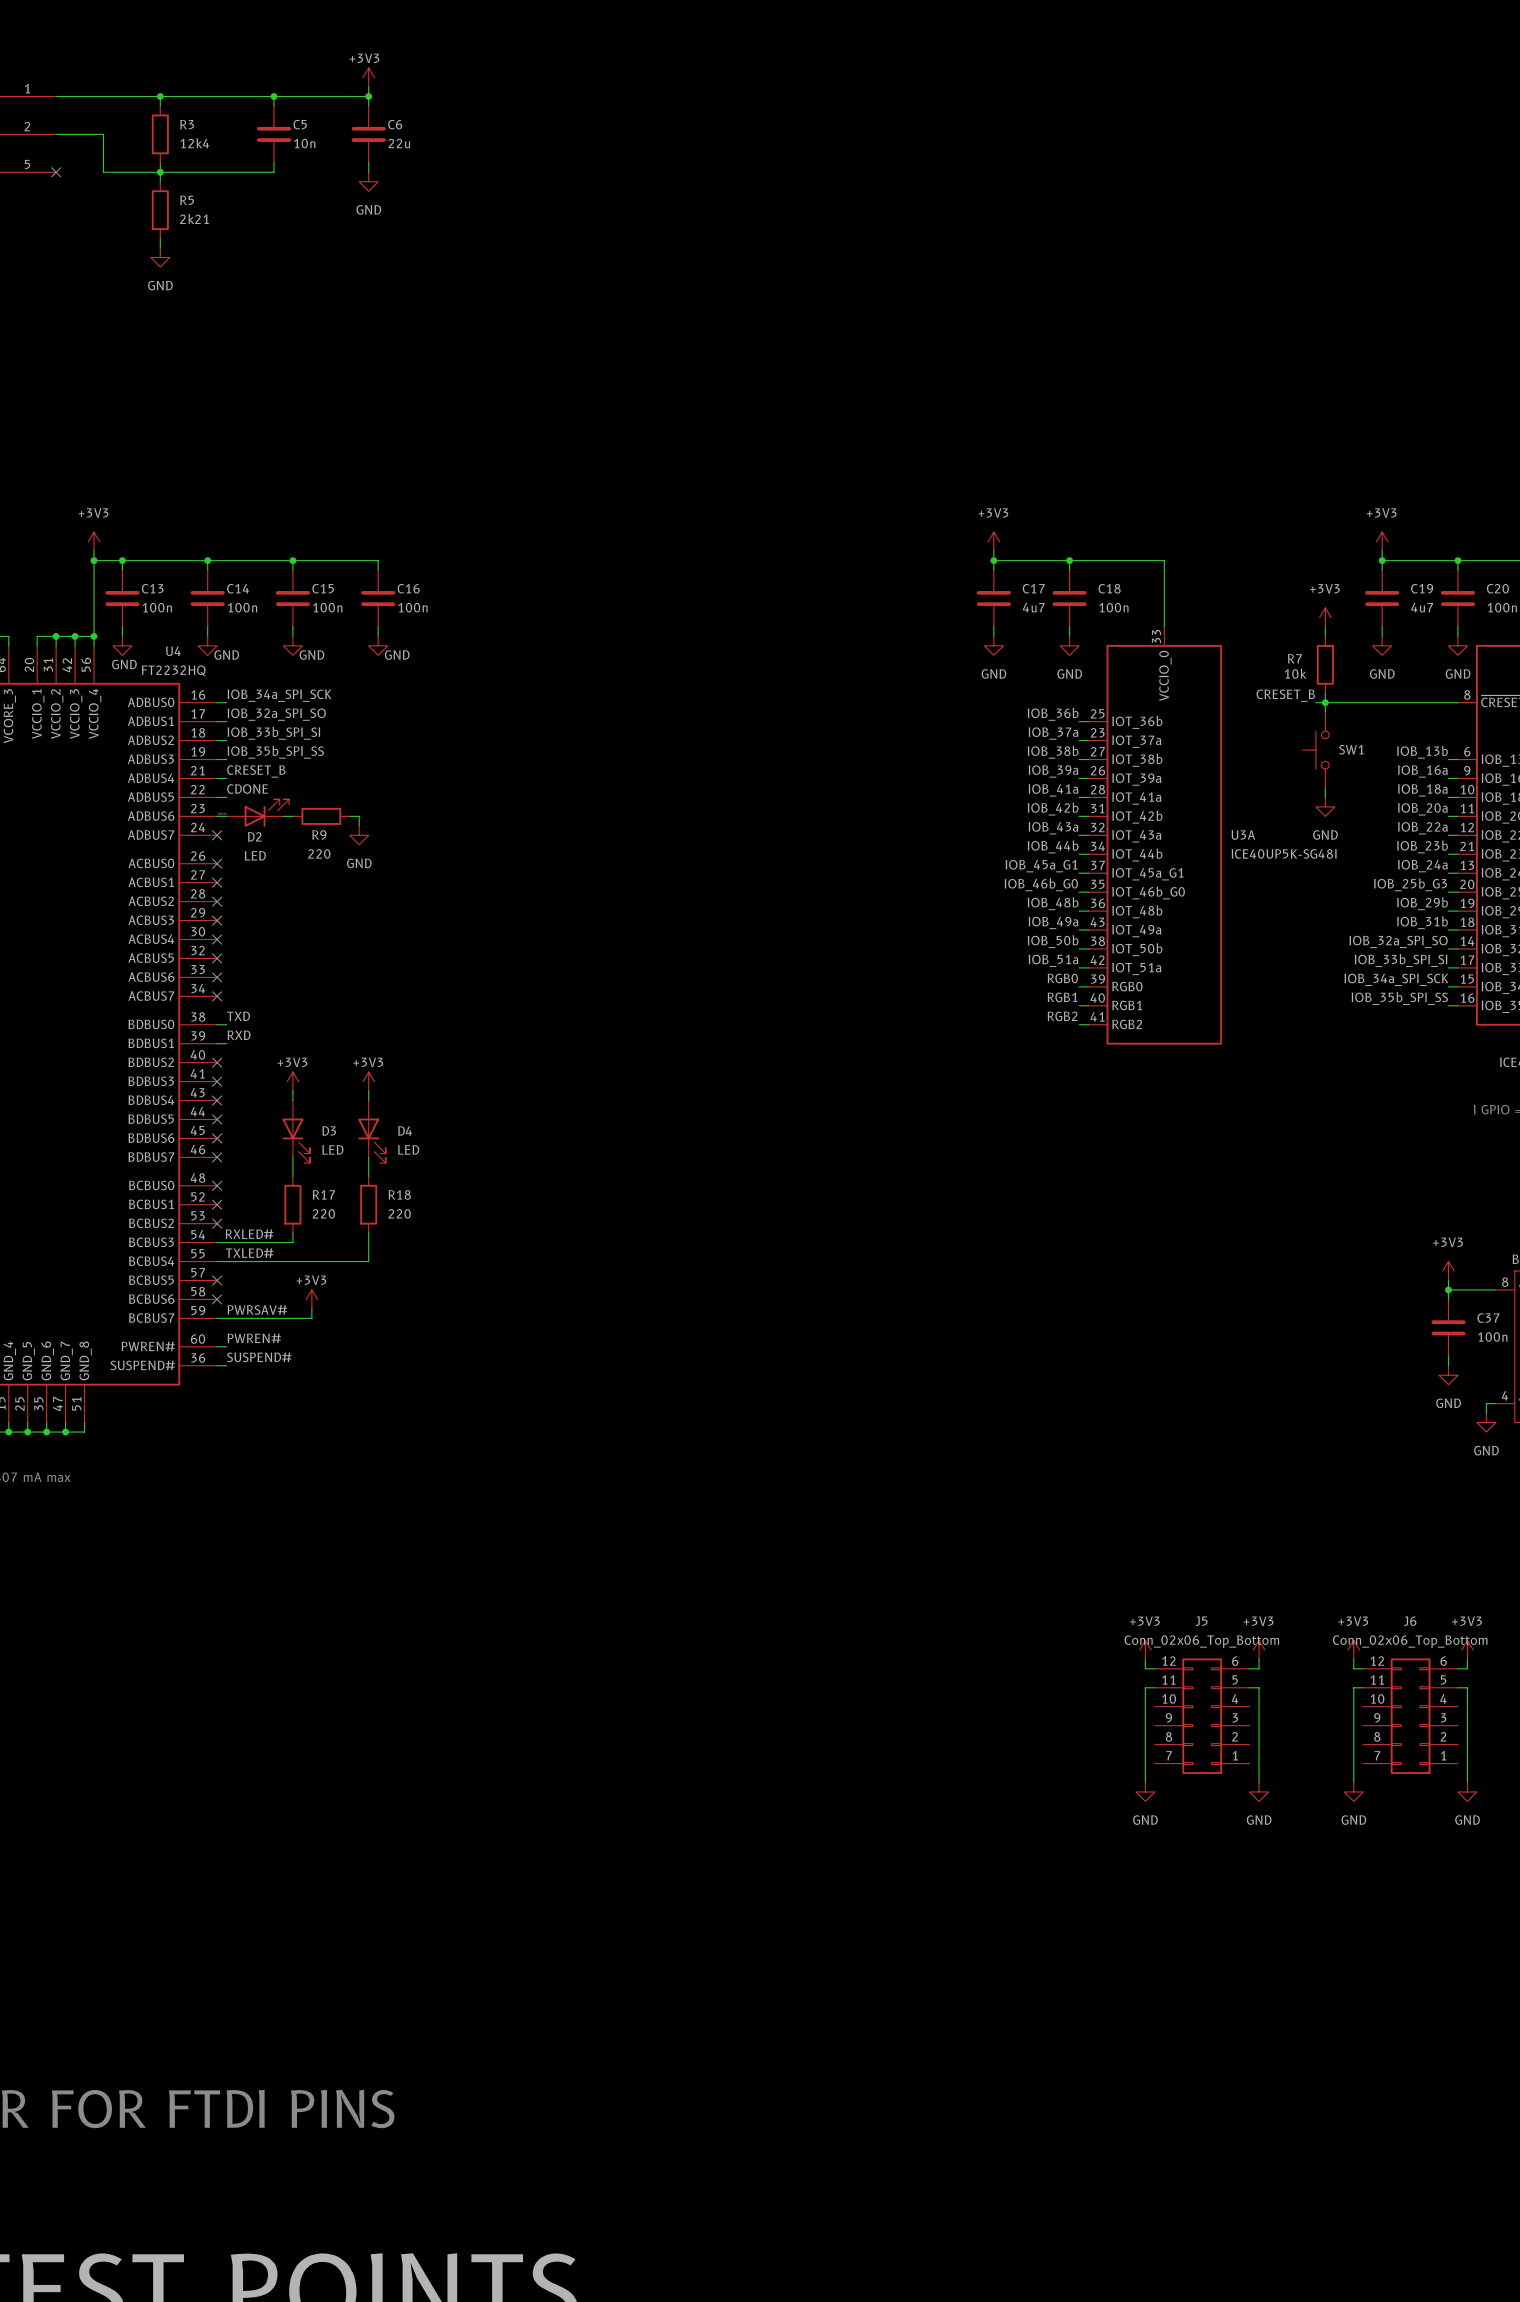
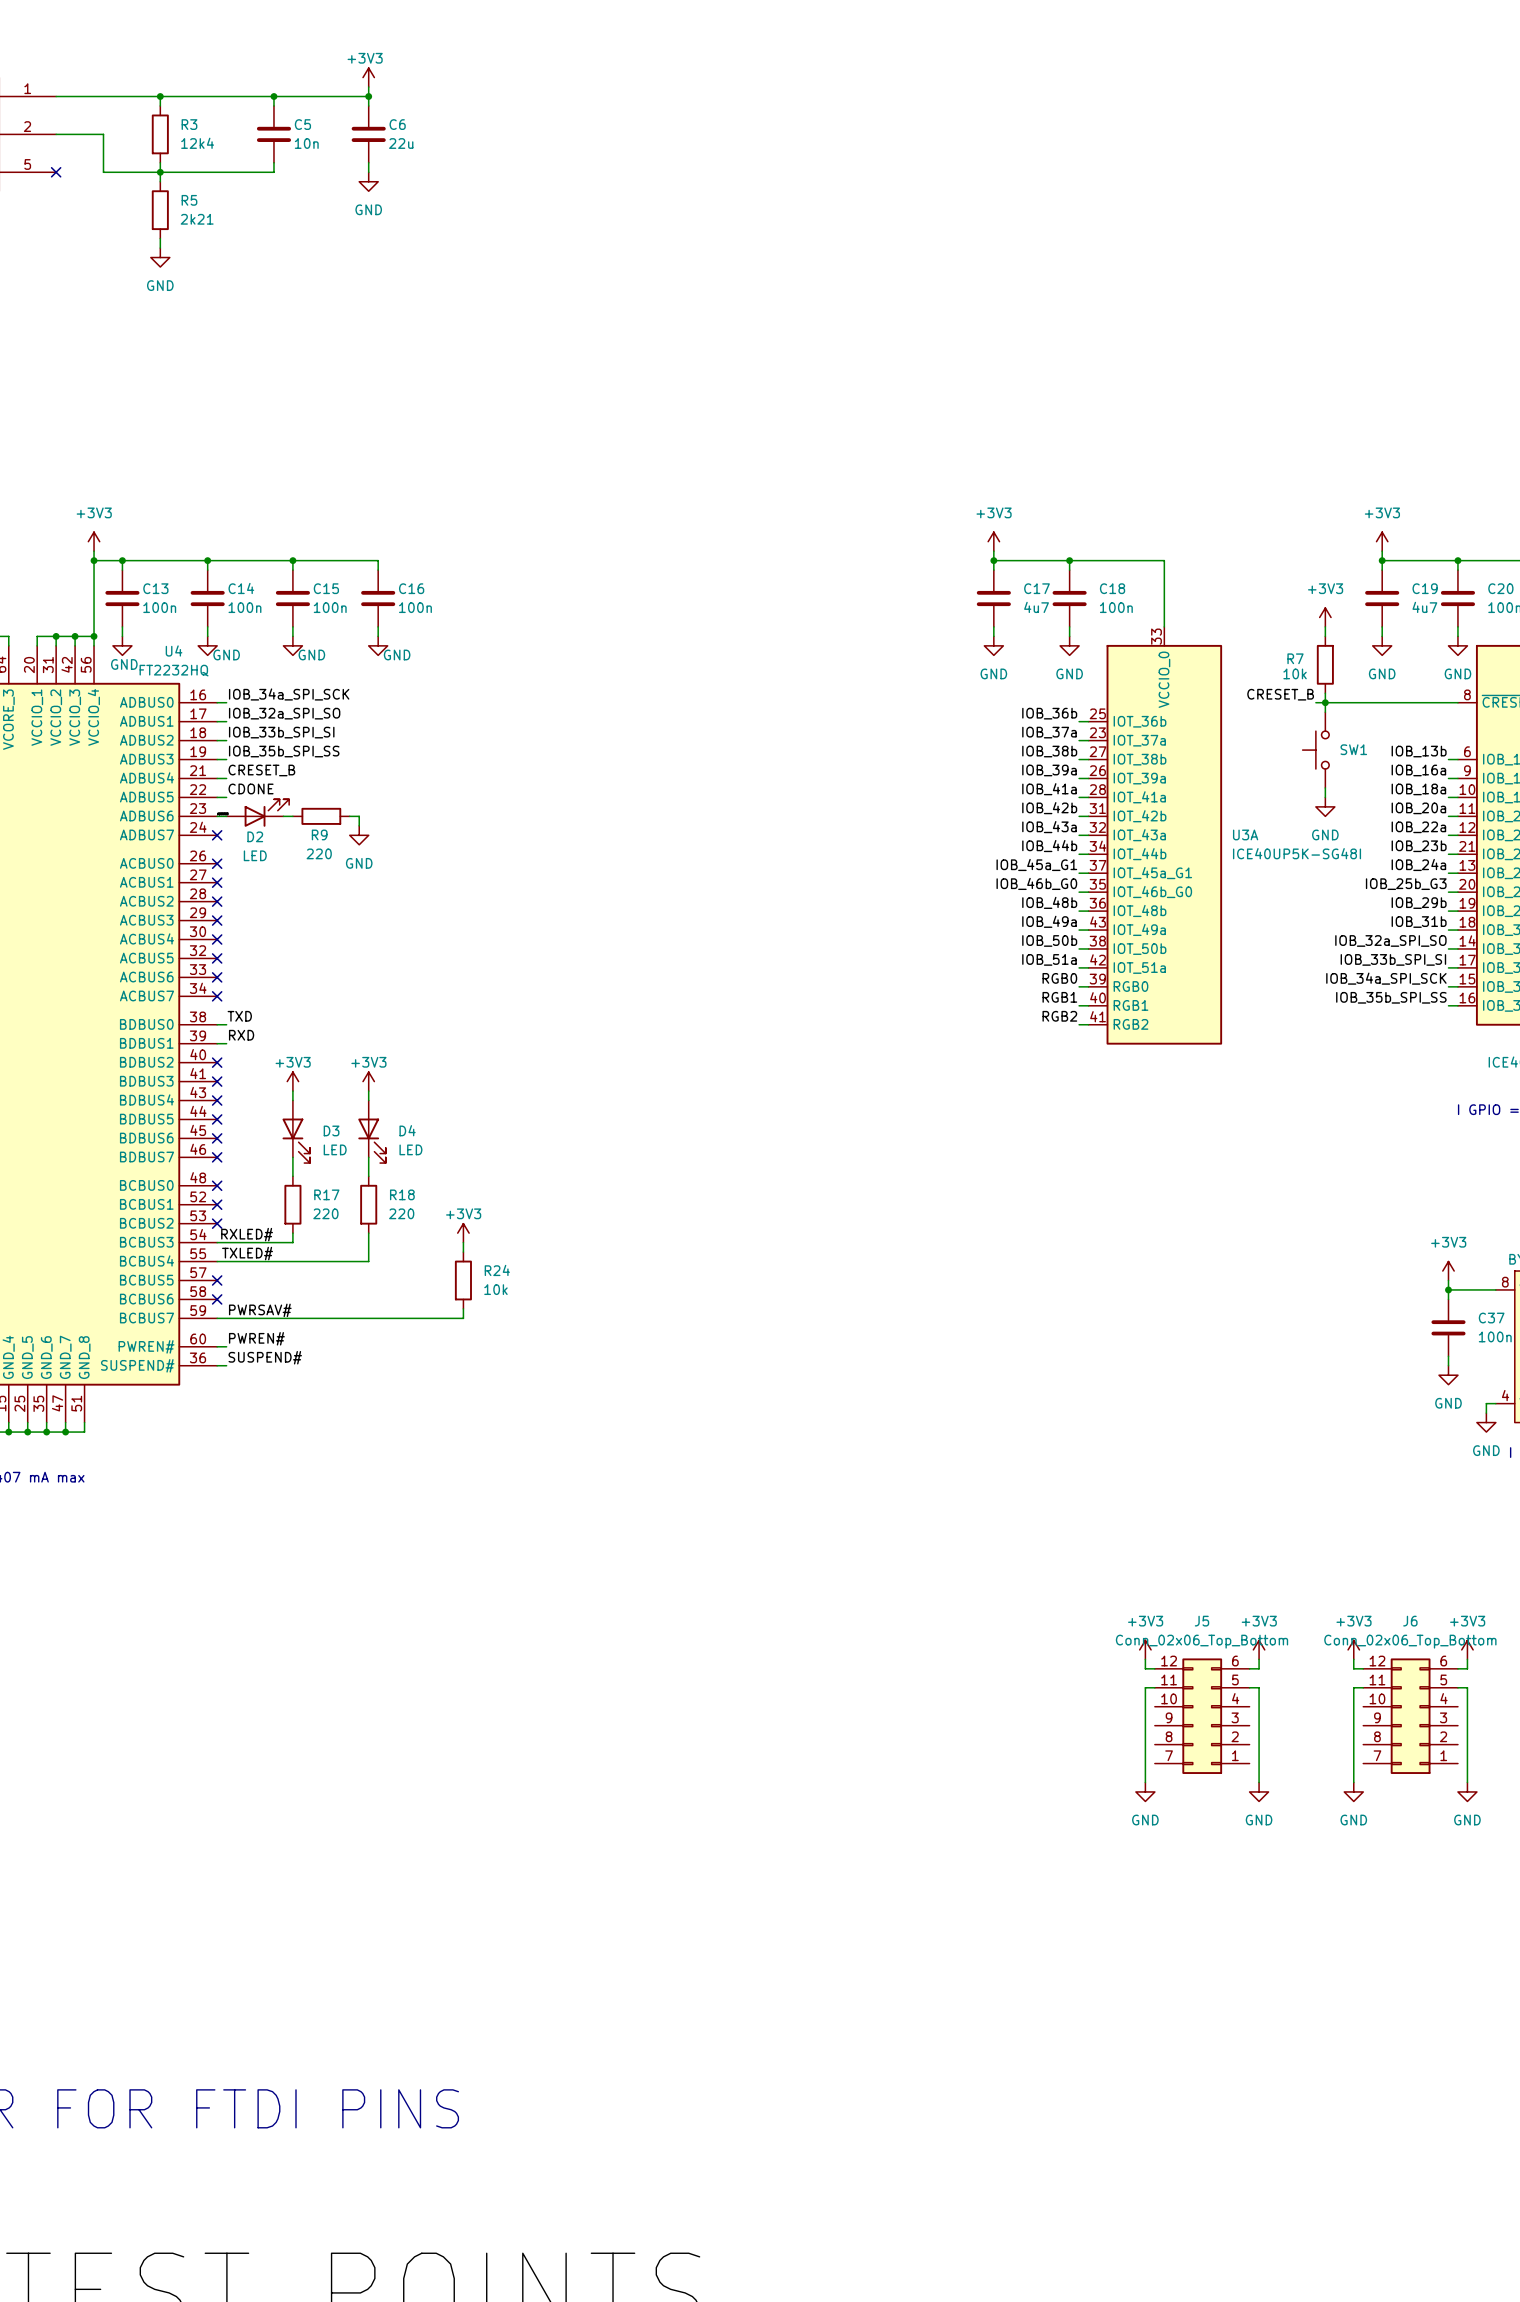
wire: none -> (463, 1242) (463, 1252)
R24: none -> 10k (463, 1280)
power symbol position: +3V3 (311, 1299) -> +3V3 (463, 1233)
wire: (311, 1308) (311, 1318) -> (463, 1308) (463, 1318) (311, 1318)

